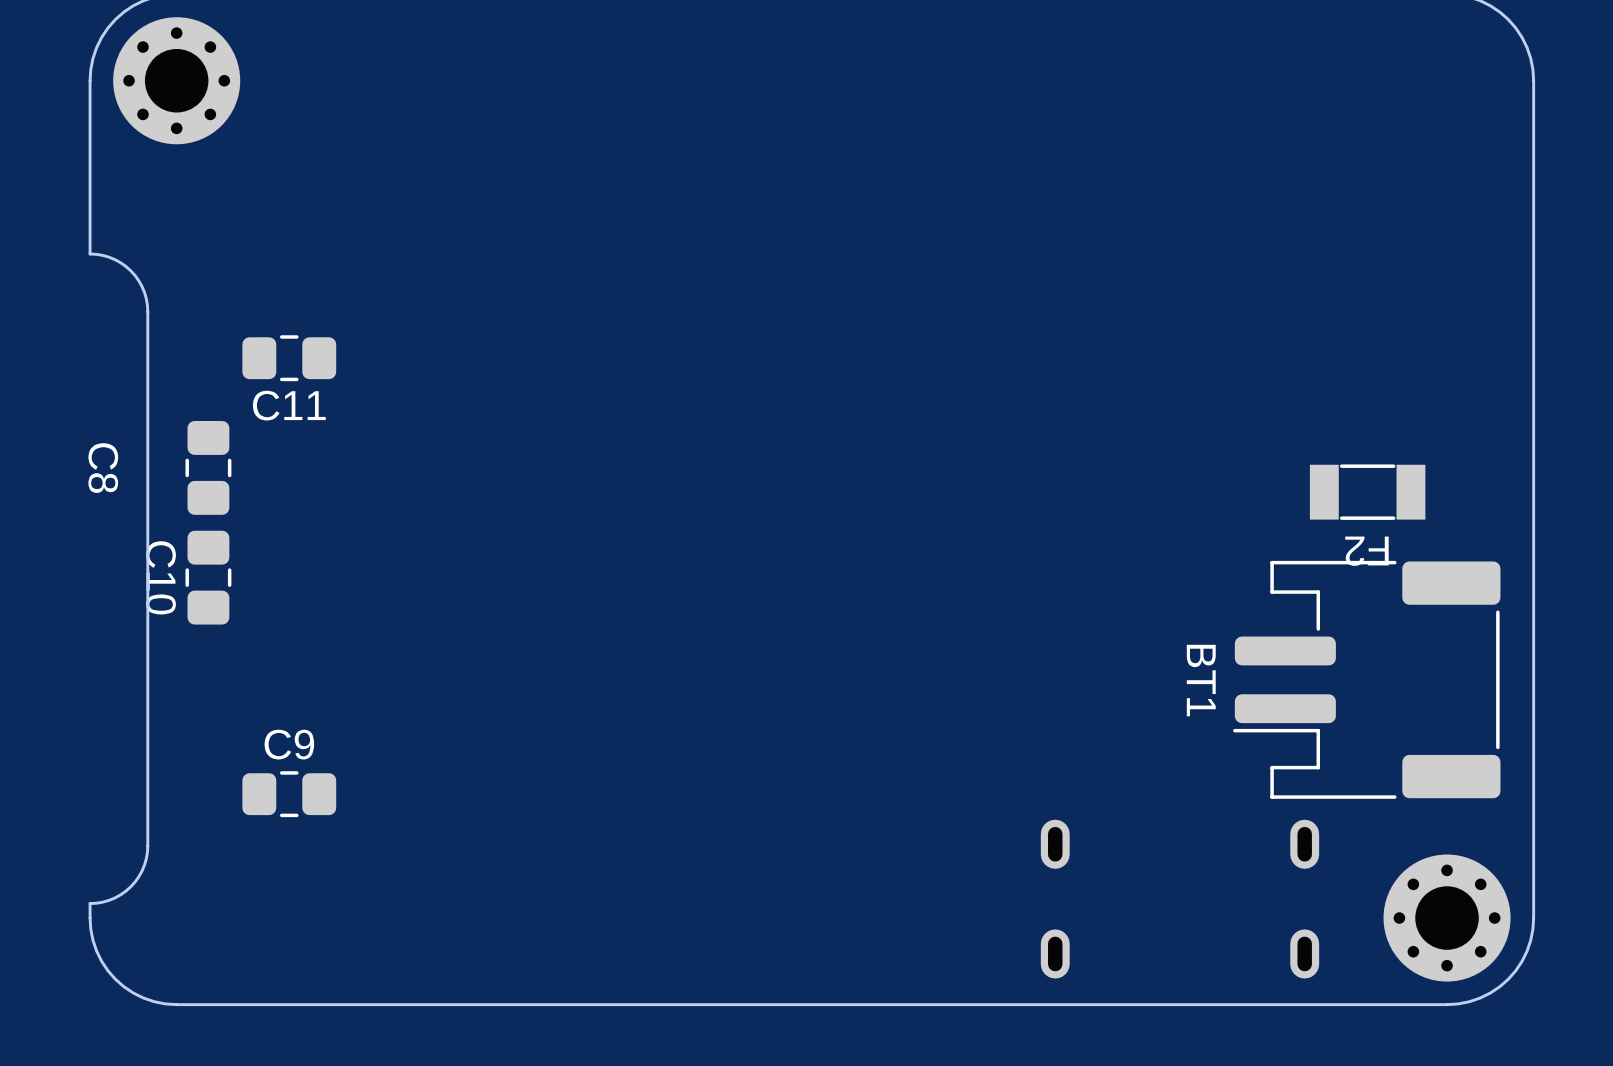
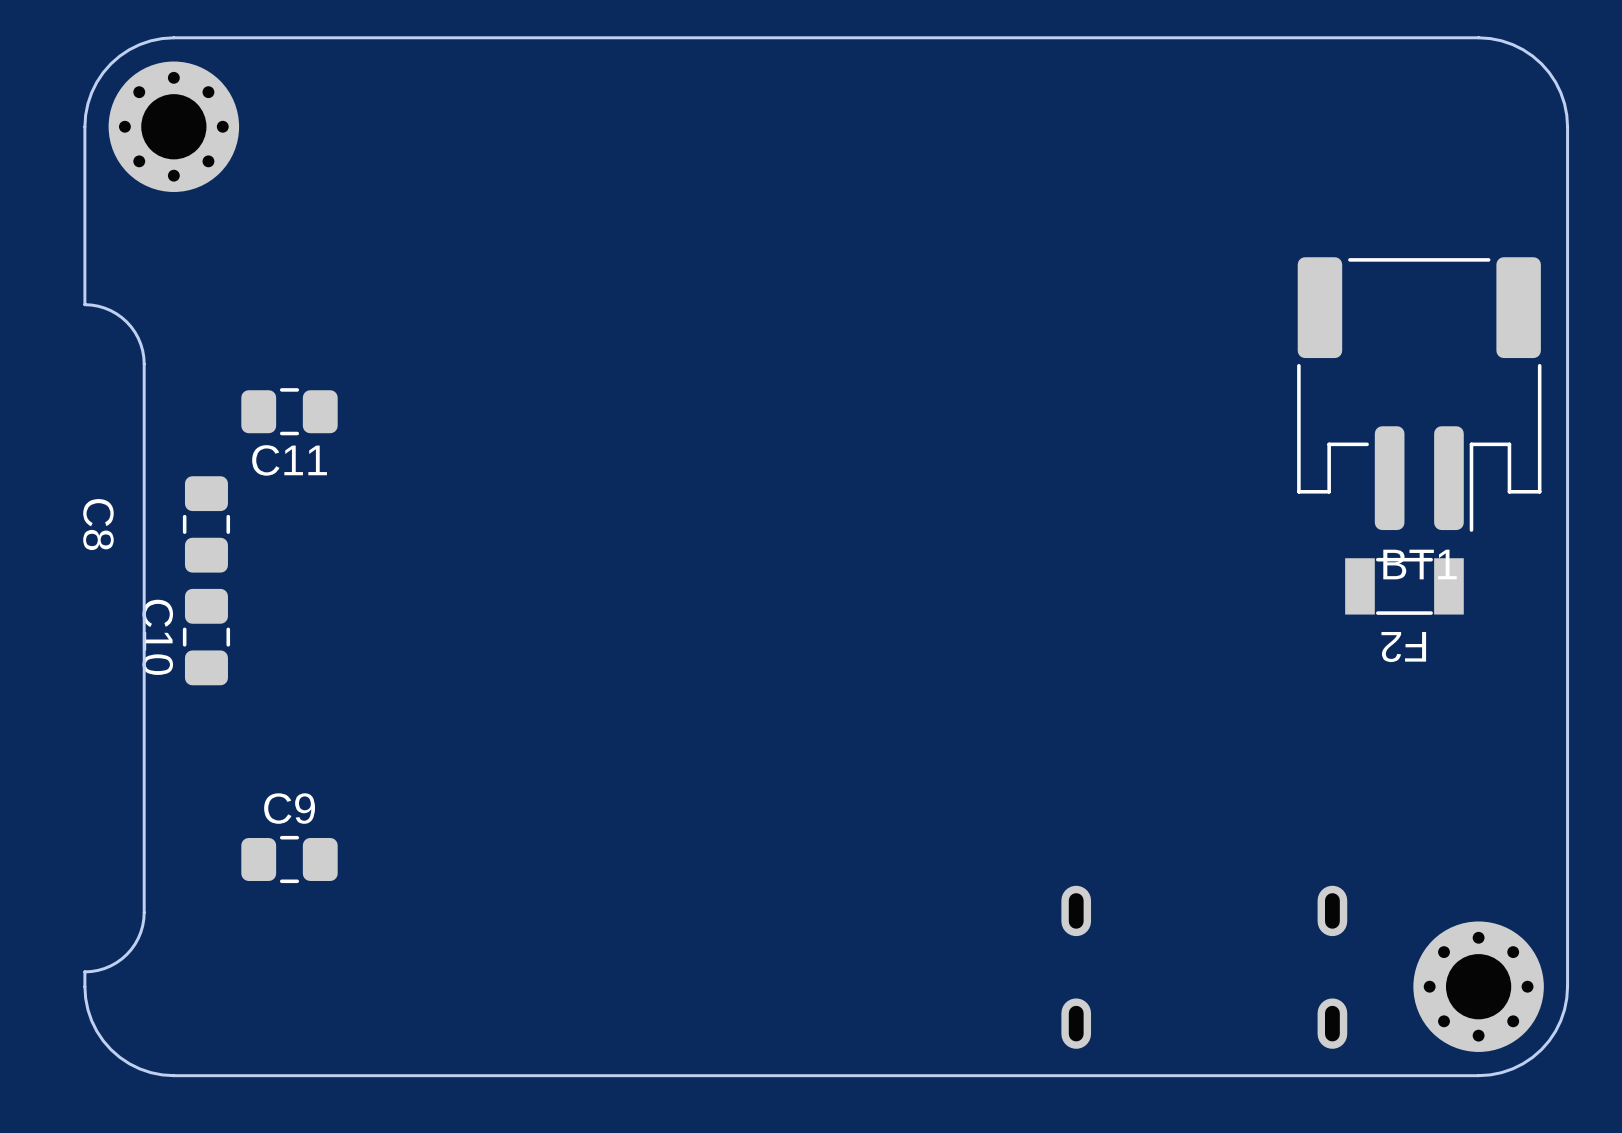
F2 position: (1367, 492) -> (1404, 586)
BT1 rotation: 0° (1366, 679) -> 90° counterclockwise (1419, 394)
BT1 position: (1366, 679) -> (1419, 394)

